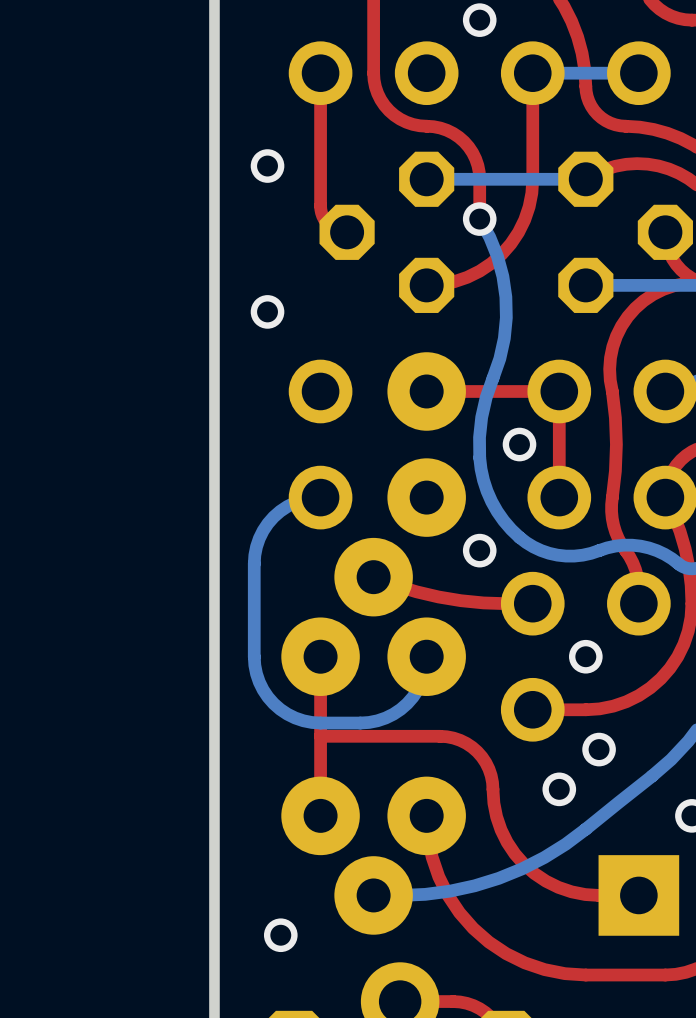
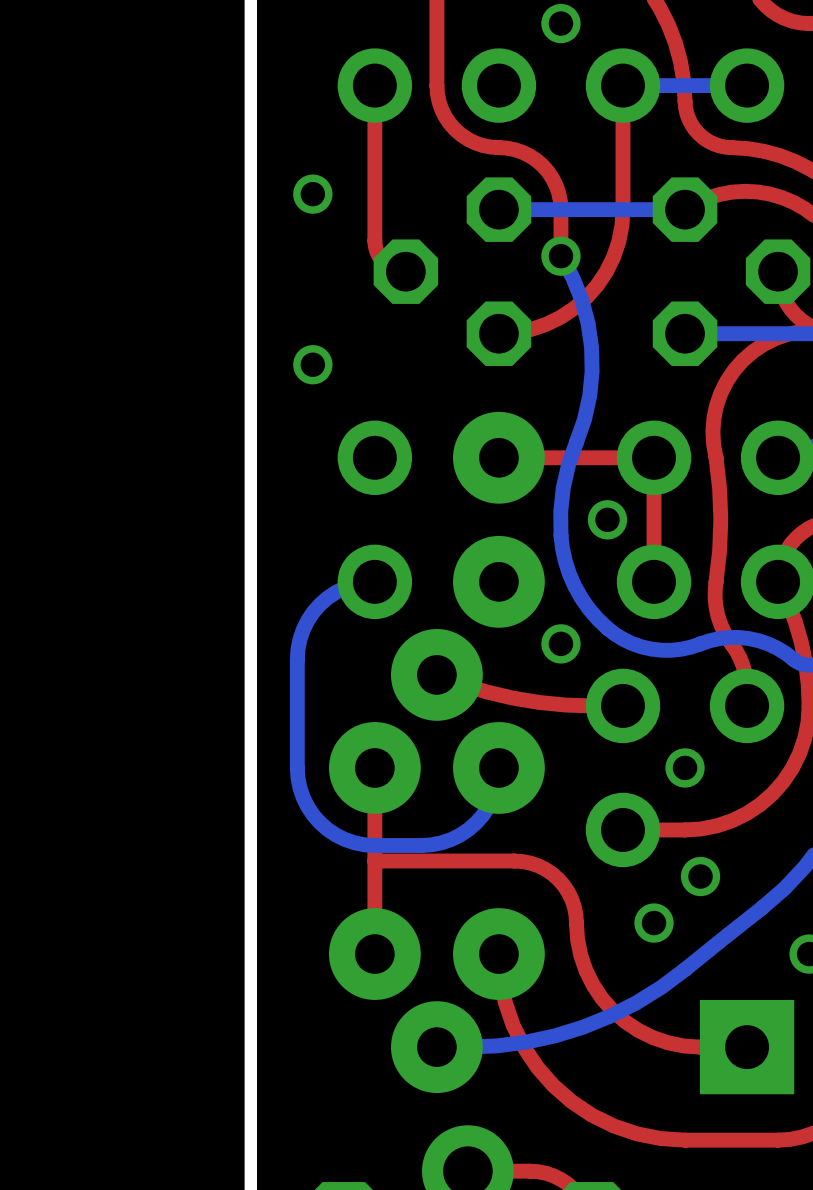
via: (280, 935) -> none

